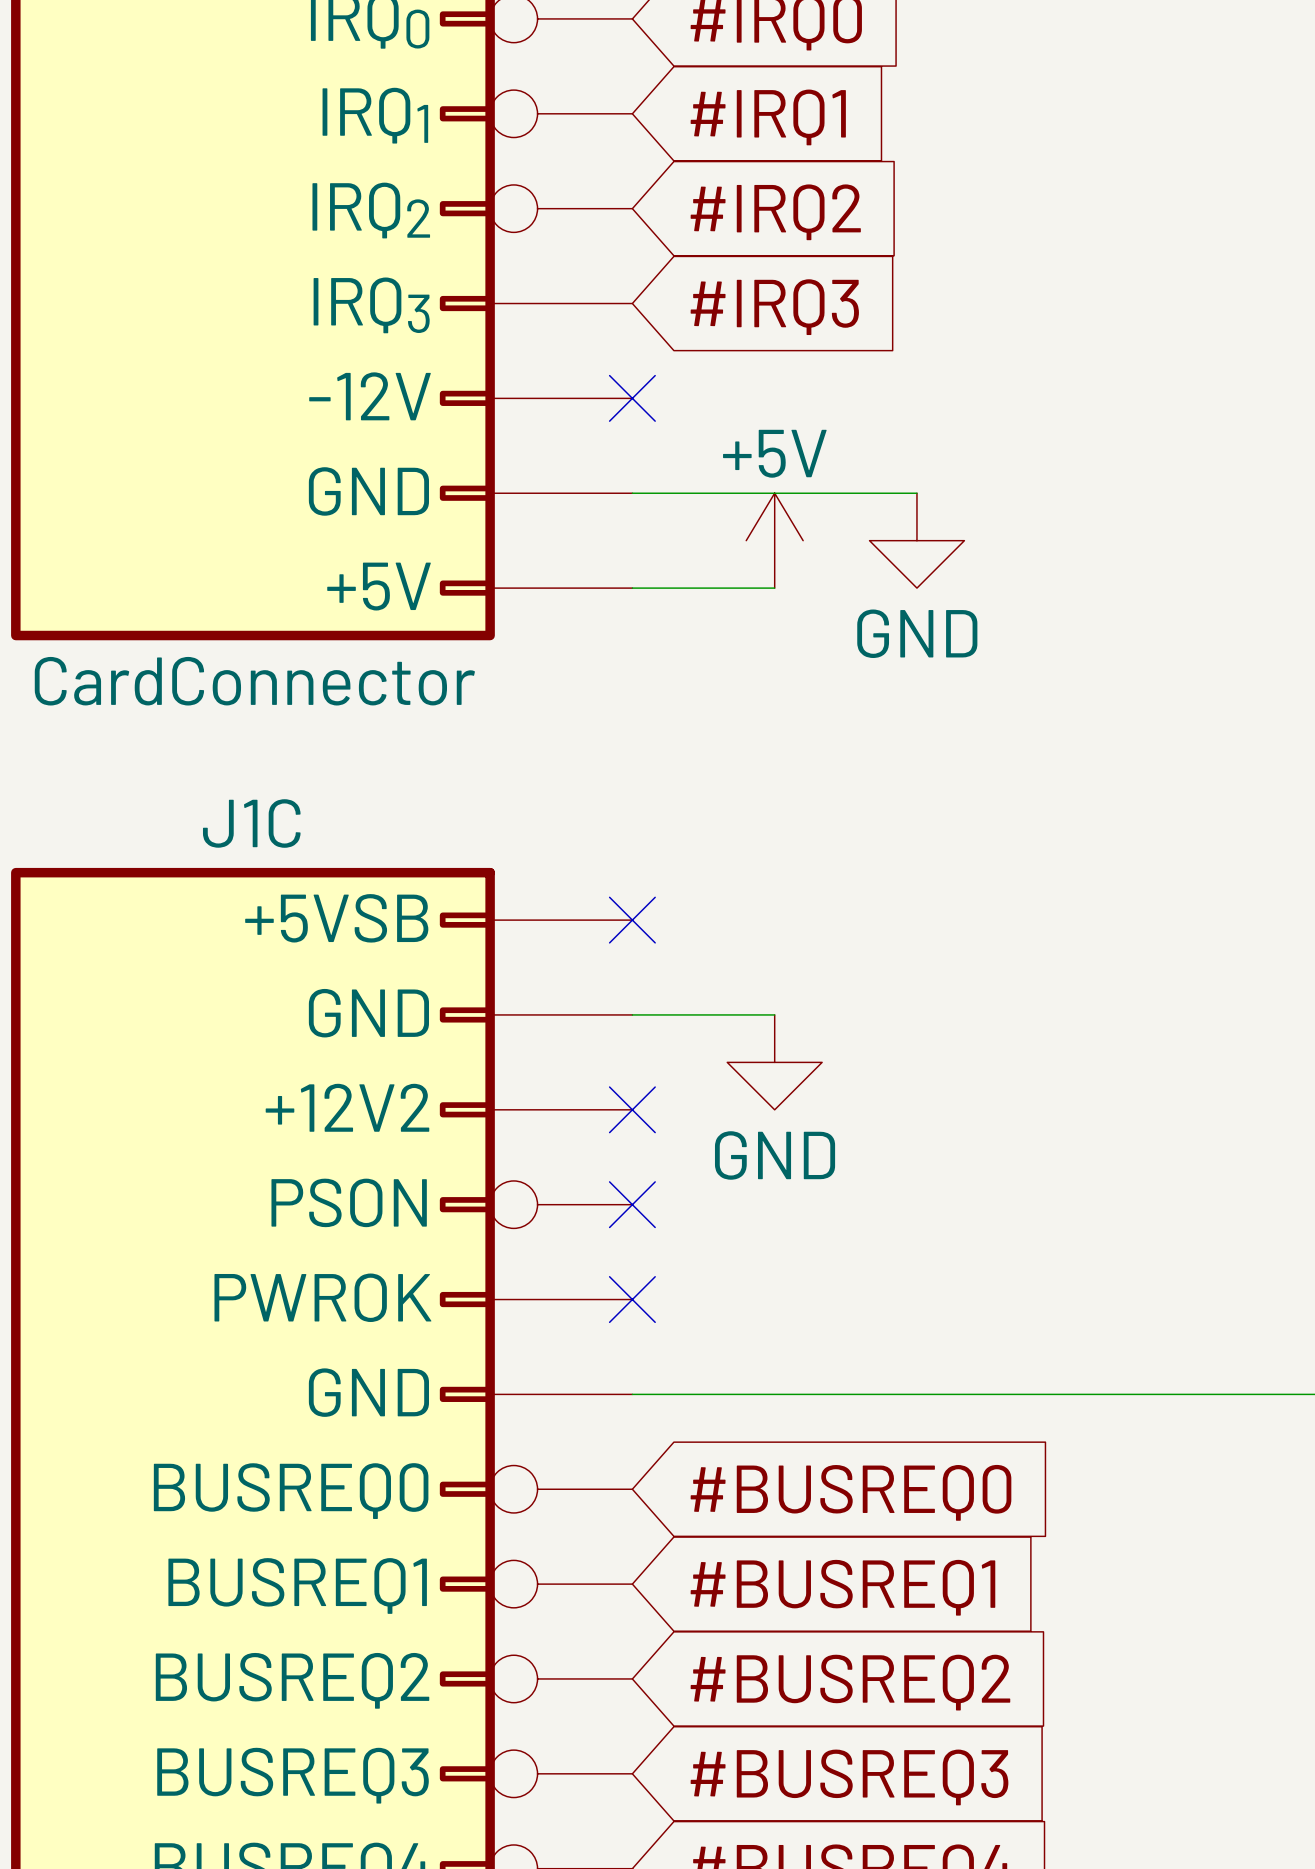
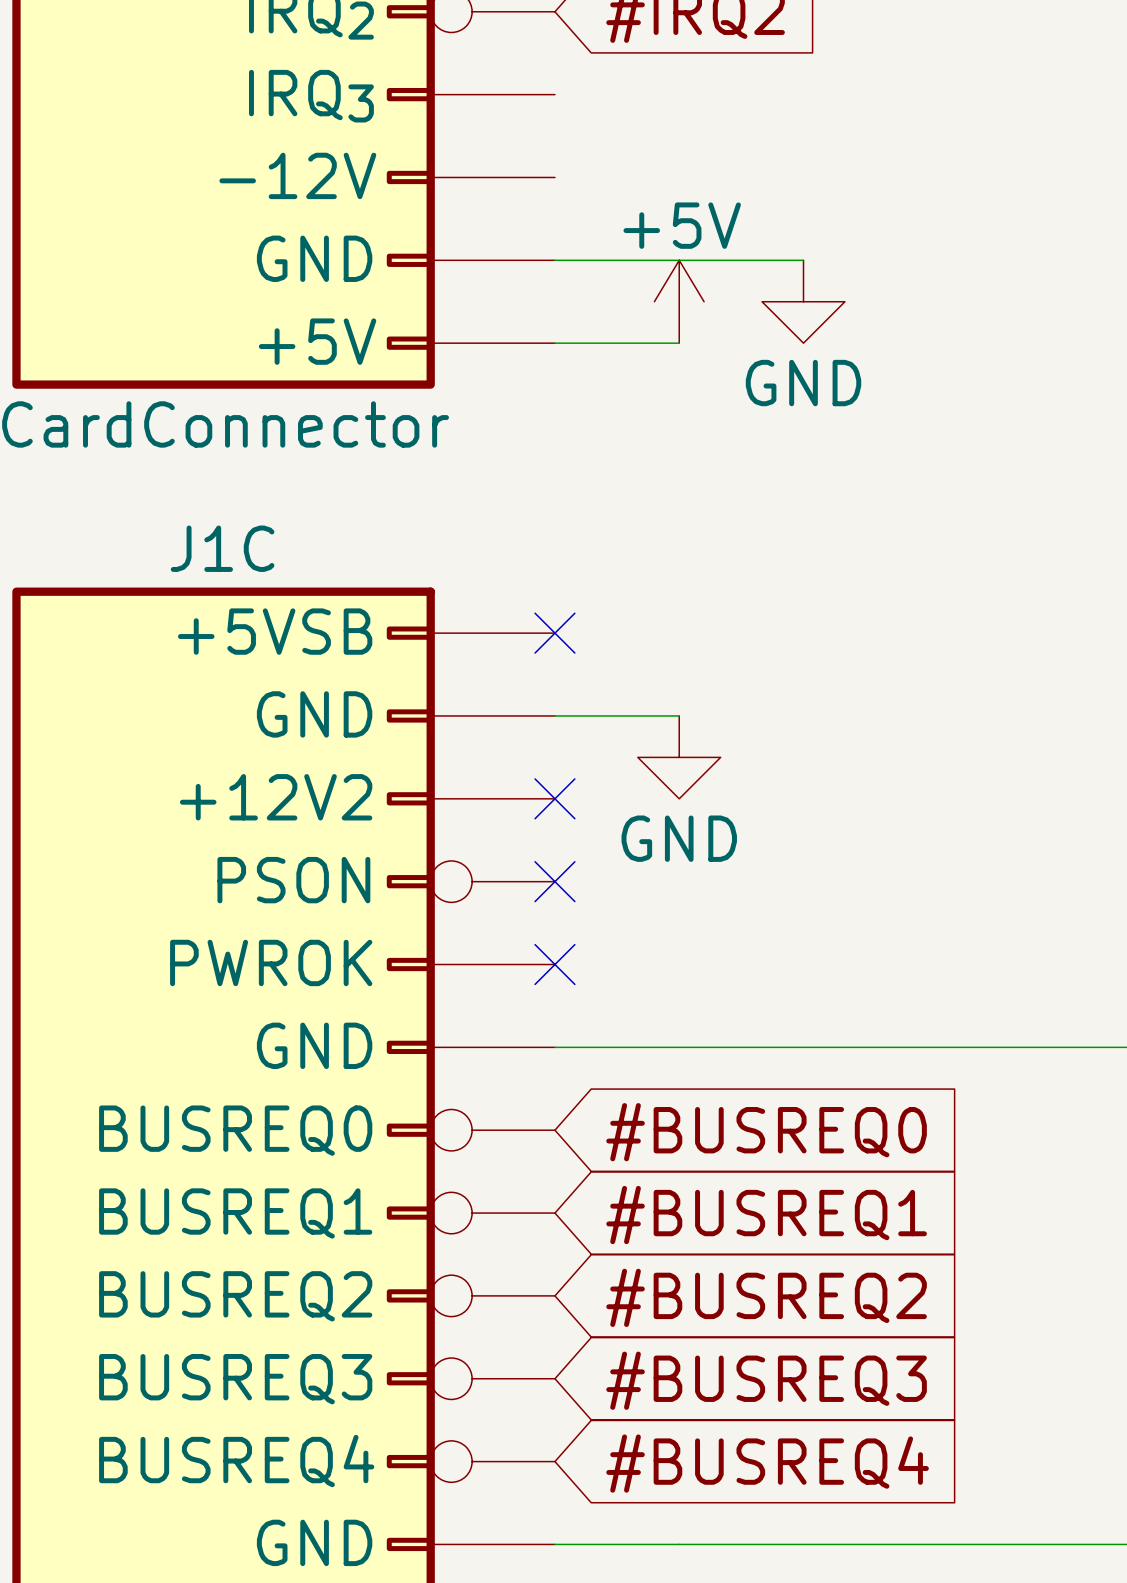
global label: #IRQ3 (774, 307) -> none
no-connect mark: (632, 398) -> none

